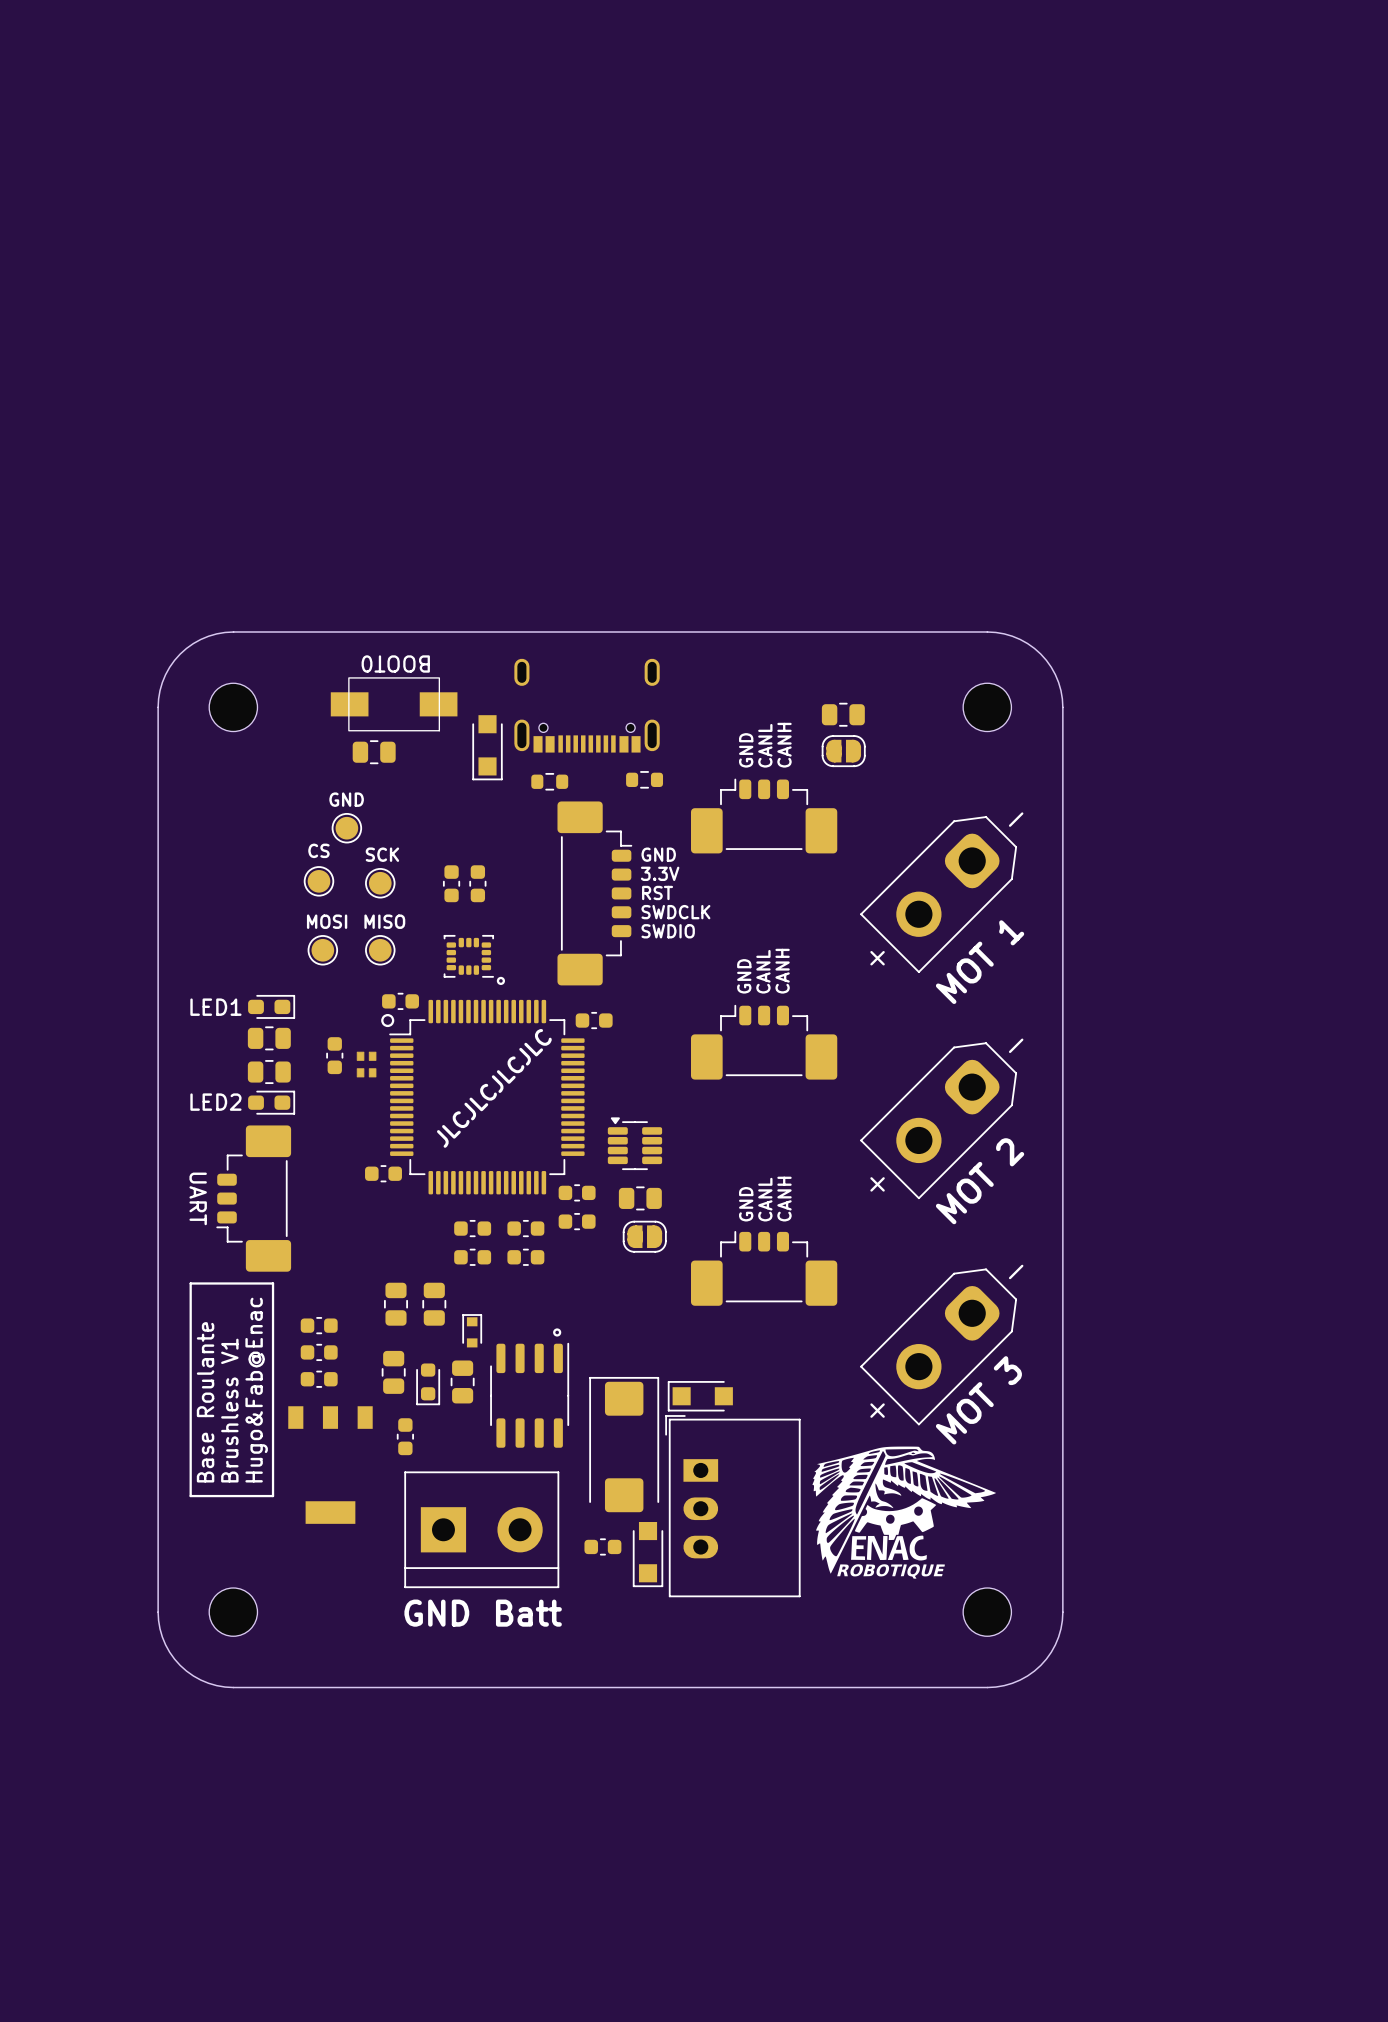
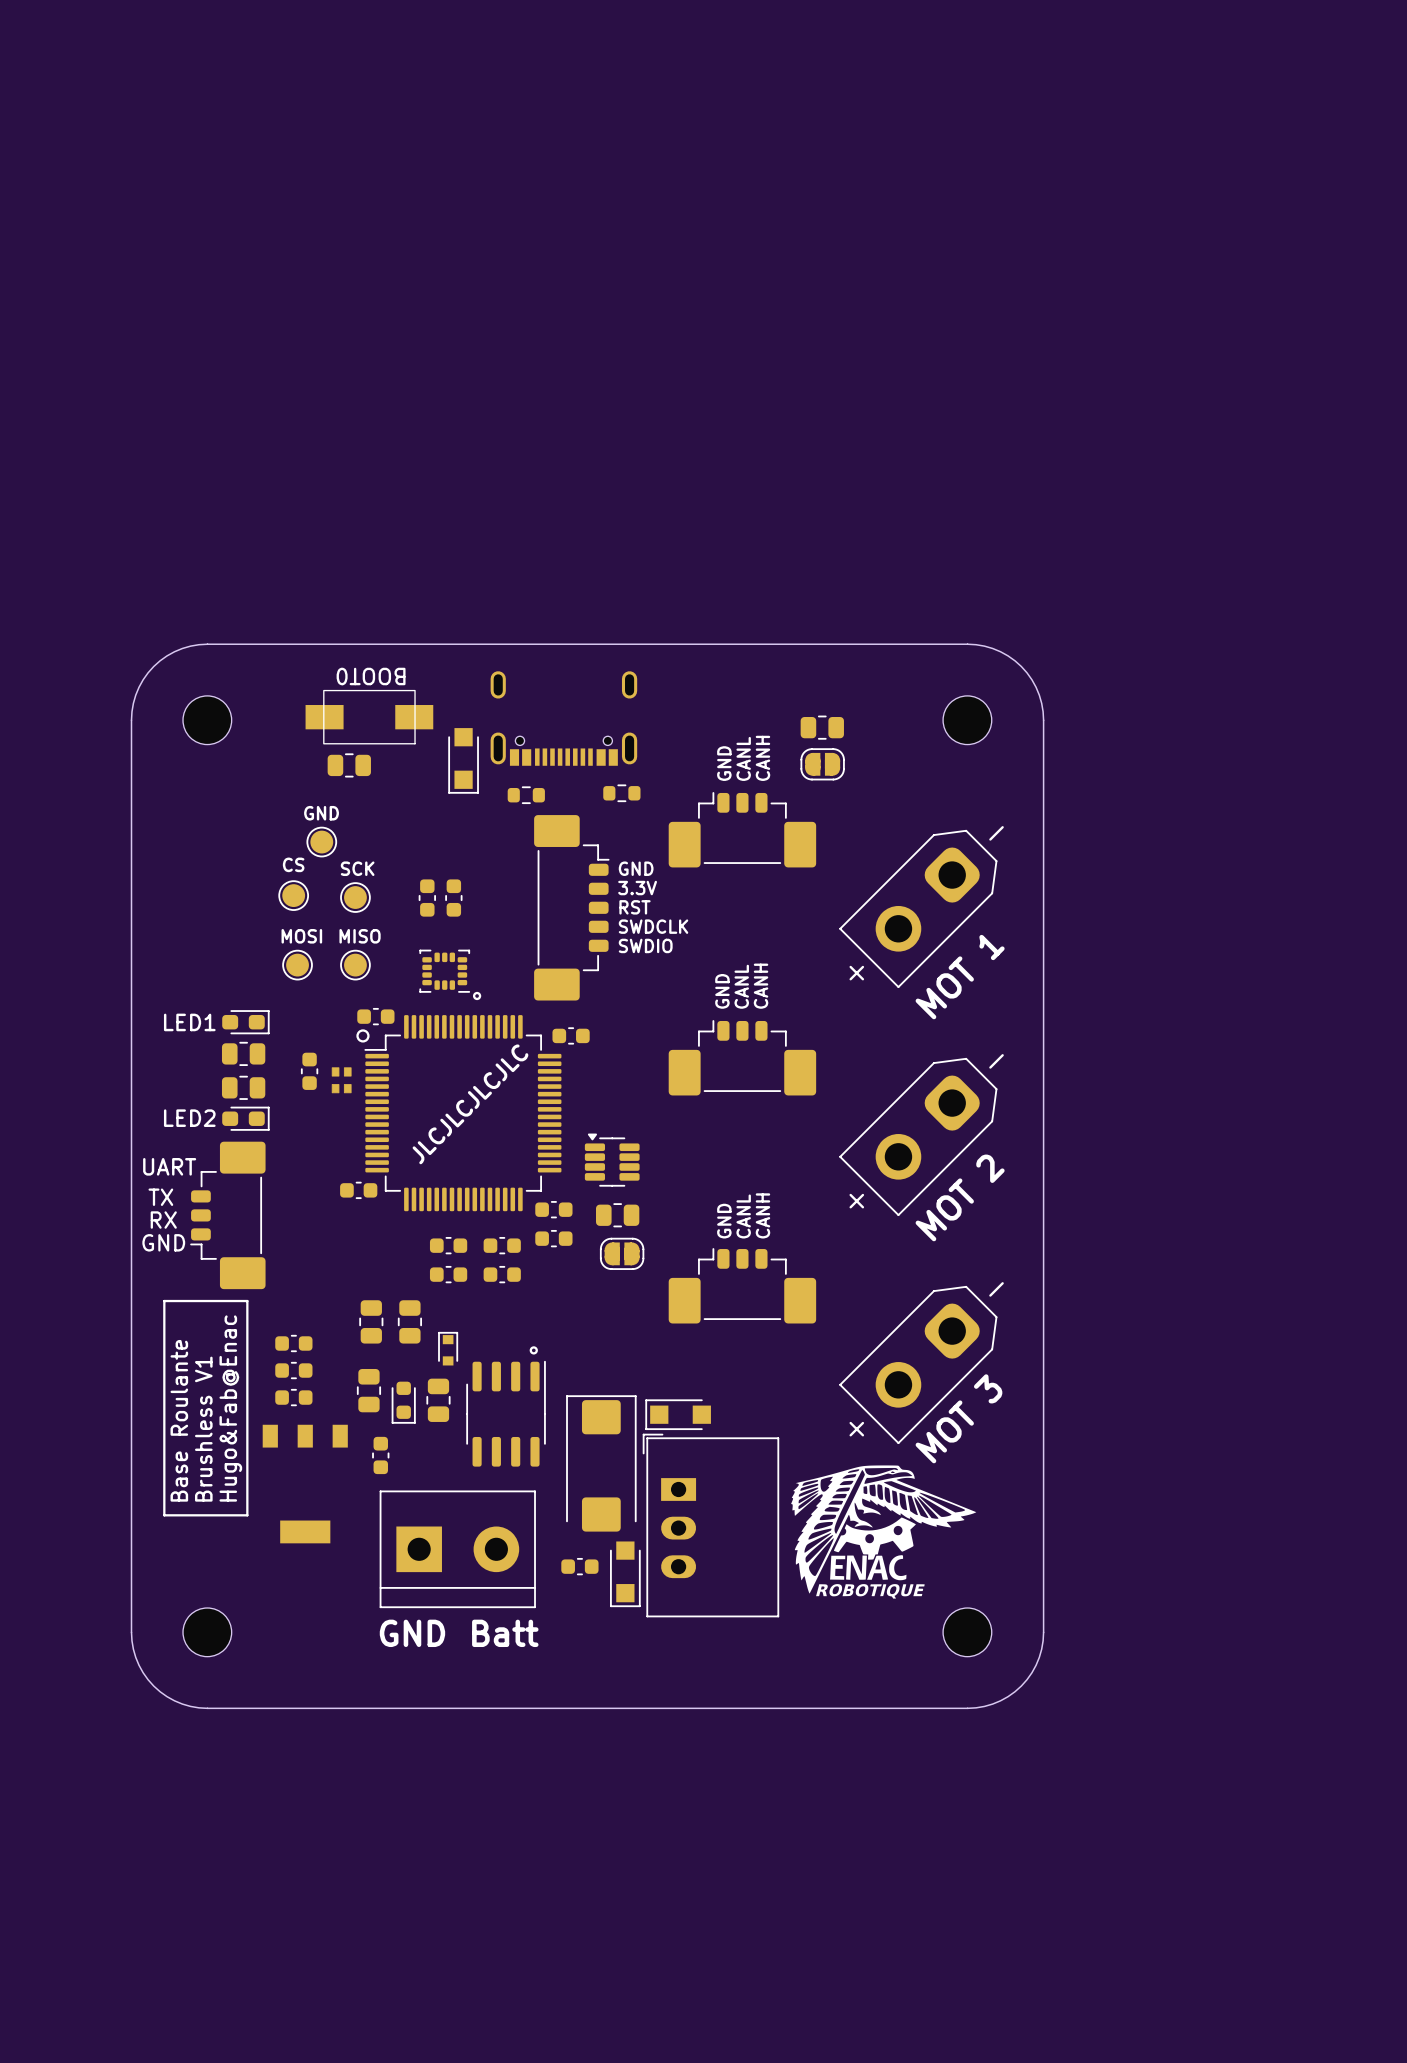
text: none -> TX (160, 1197)
text rotation: 0° (198, 1198) -> 90° counterclockwise (169, 1166)
text: none -> RX (163, 1220)
text: none -> GND (163, 1242)

